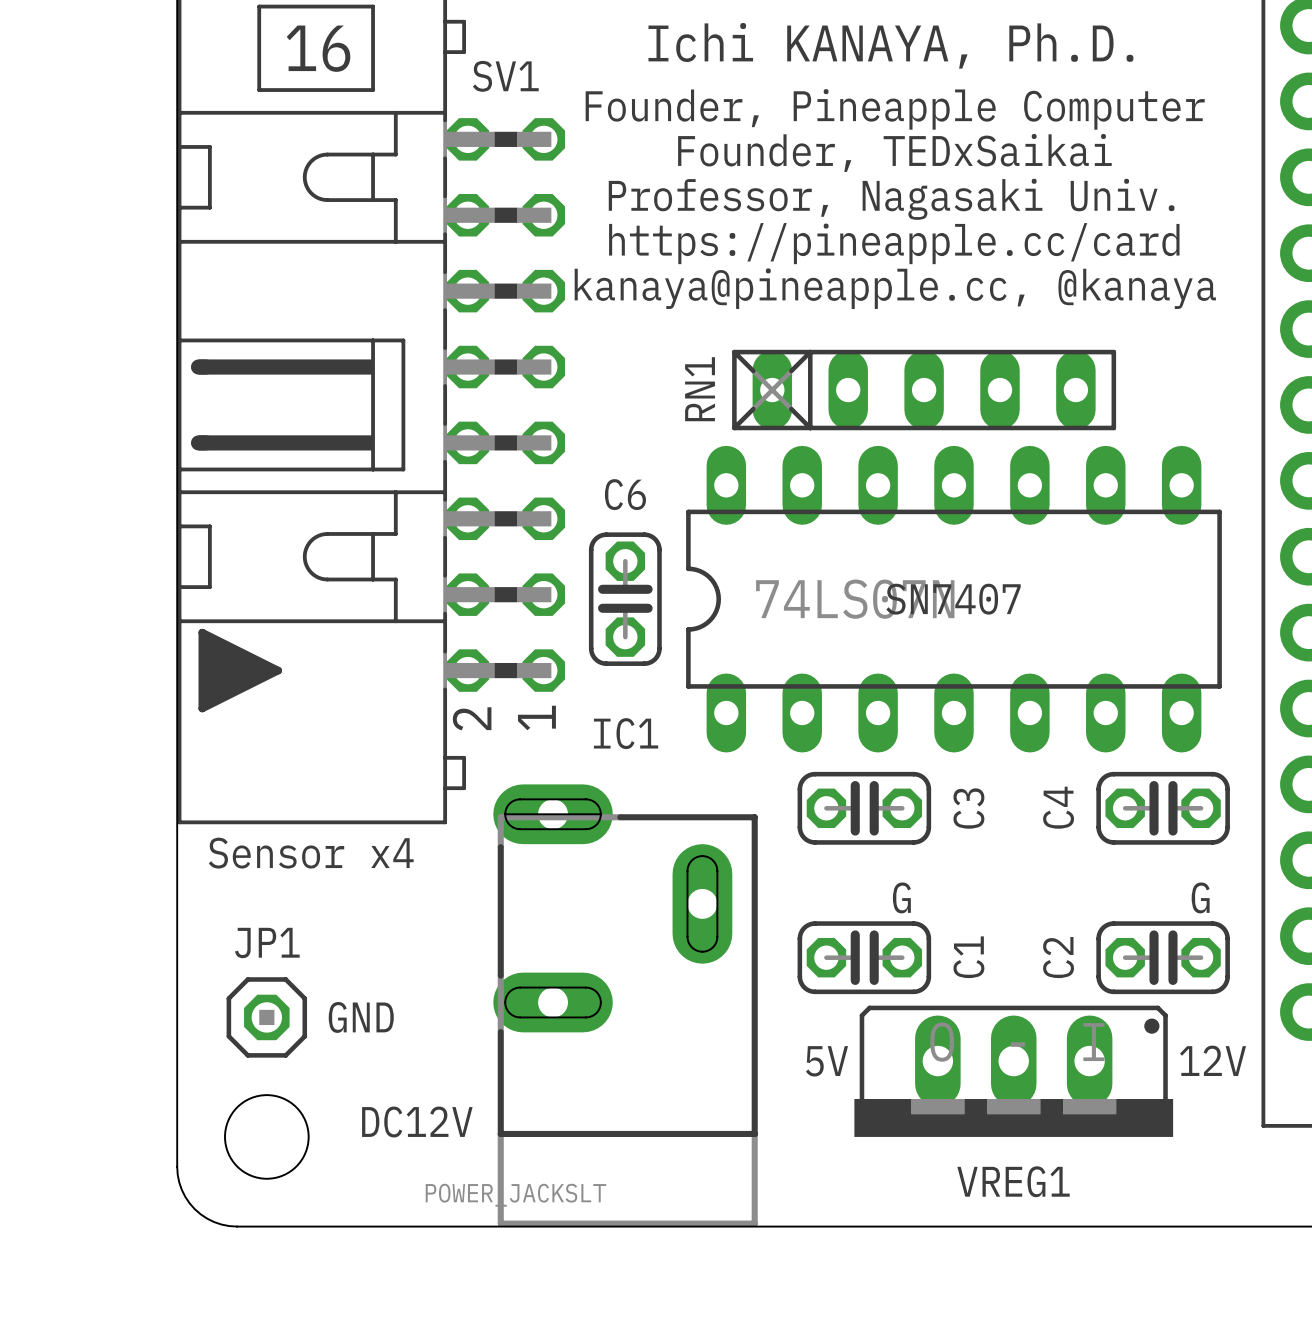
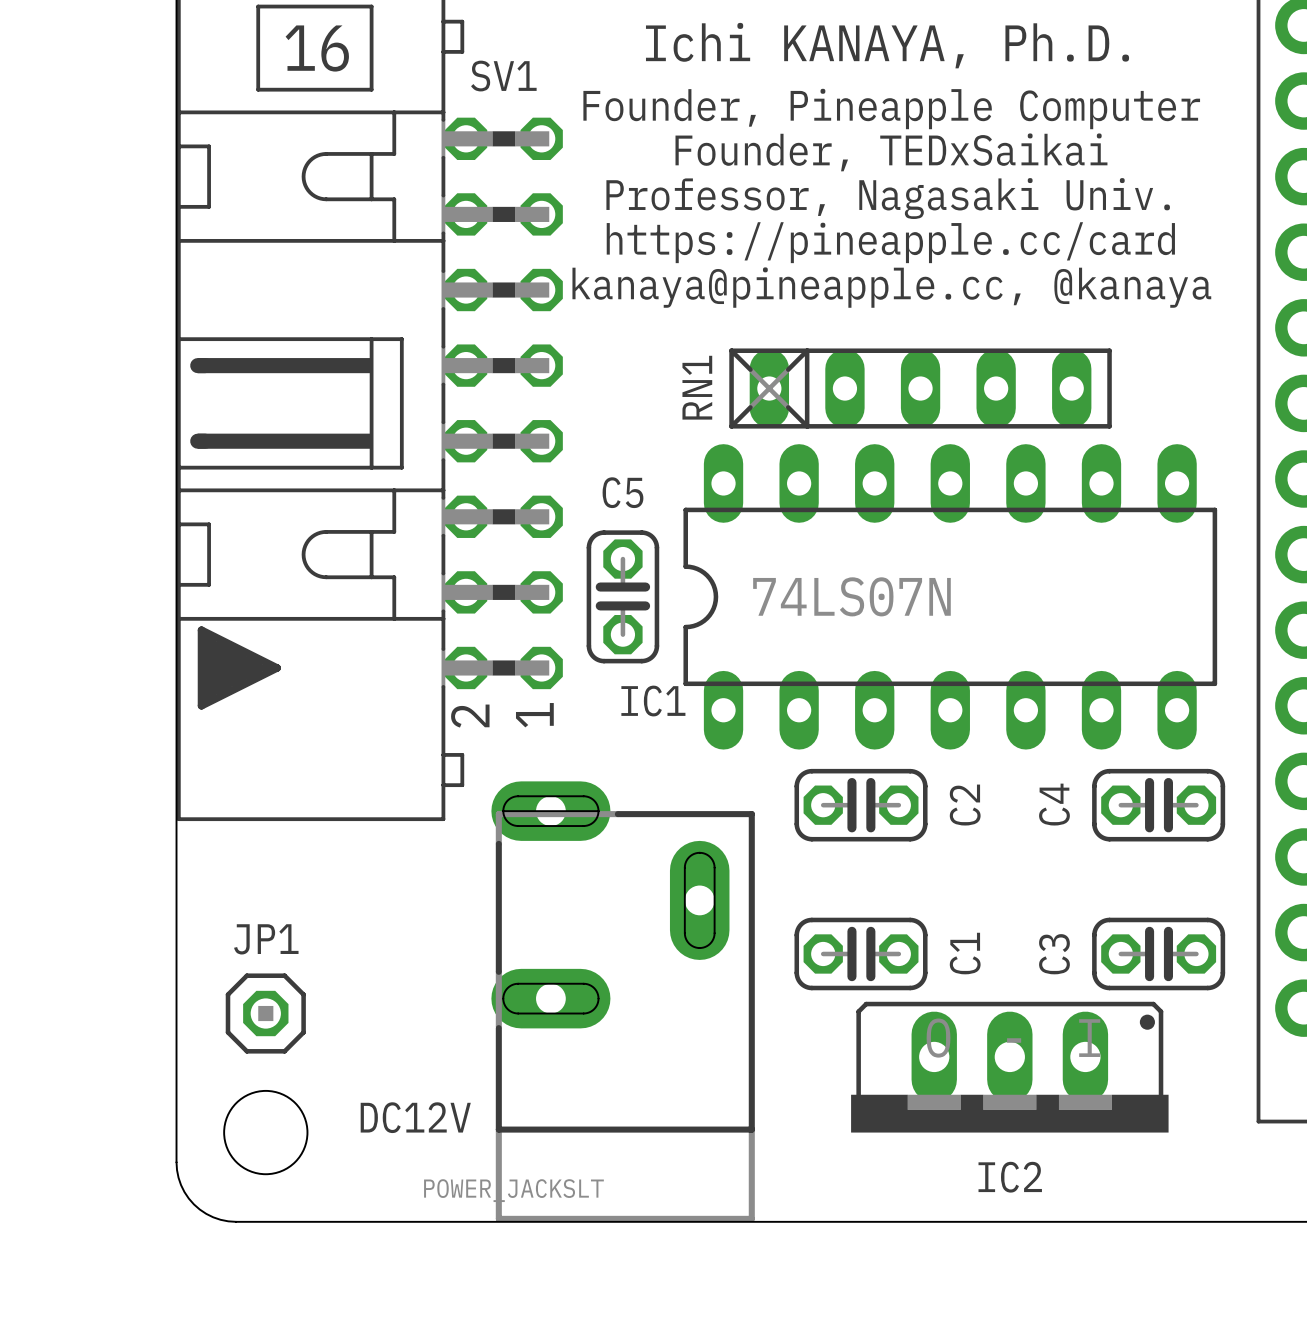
C6 name: C6 (625, 494) -> C5 (622, 492)
text: SN7407 (953, 599) -> none
IC1 name position: IC1 (626, 733) -> IC1 (653, 701)
C3 name: C3 (968, 808) -> C2 (965, 805)
text: Sensor x4 (311, 853) -> none
text: G (901, 897) -> none
text: G (1200, 897) -> none
C2 name: C2 (1058, 957) -> C3 (1054, 954)
text: GND (361, 1017) -> none
text: 12V (1213, 1060) -> none
text: 5V (827, 1061) -> none
VREG1 name: VREG1 (1013, 1181) -> IC2 (1010, 1177)

